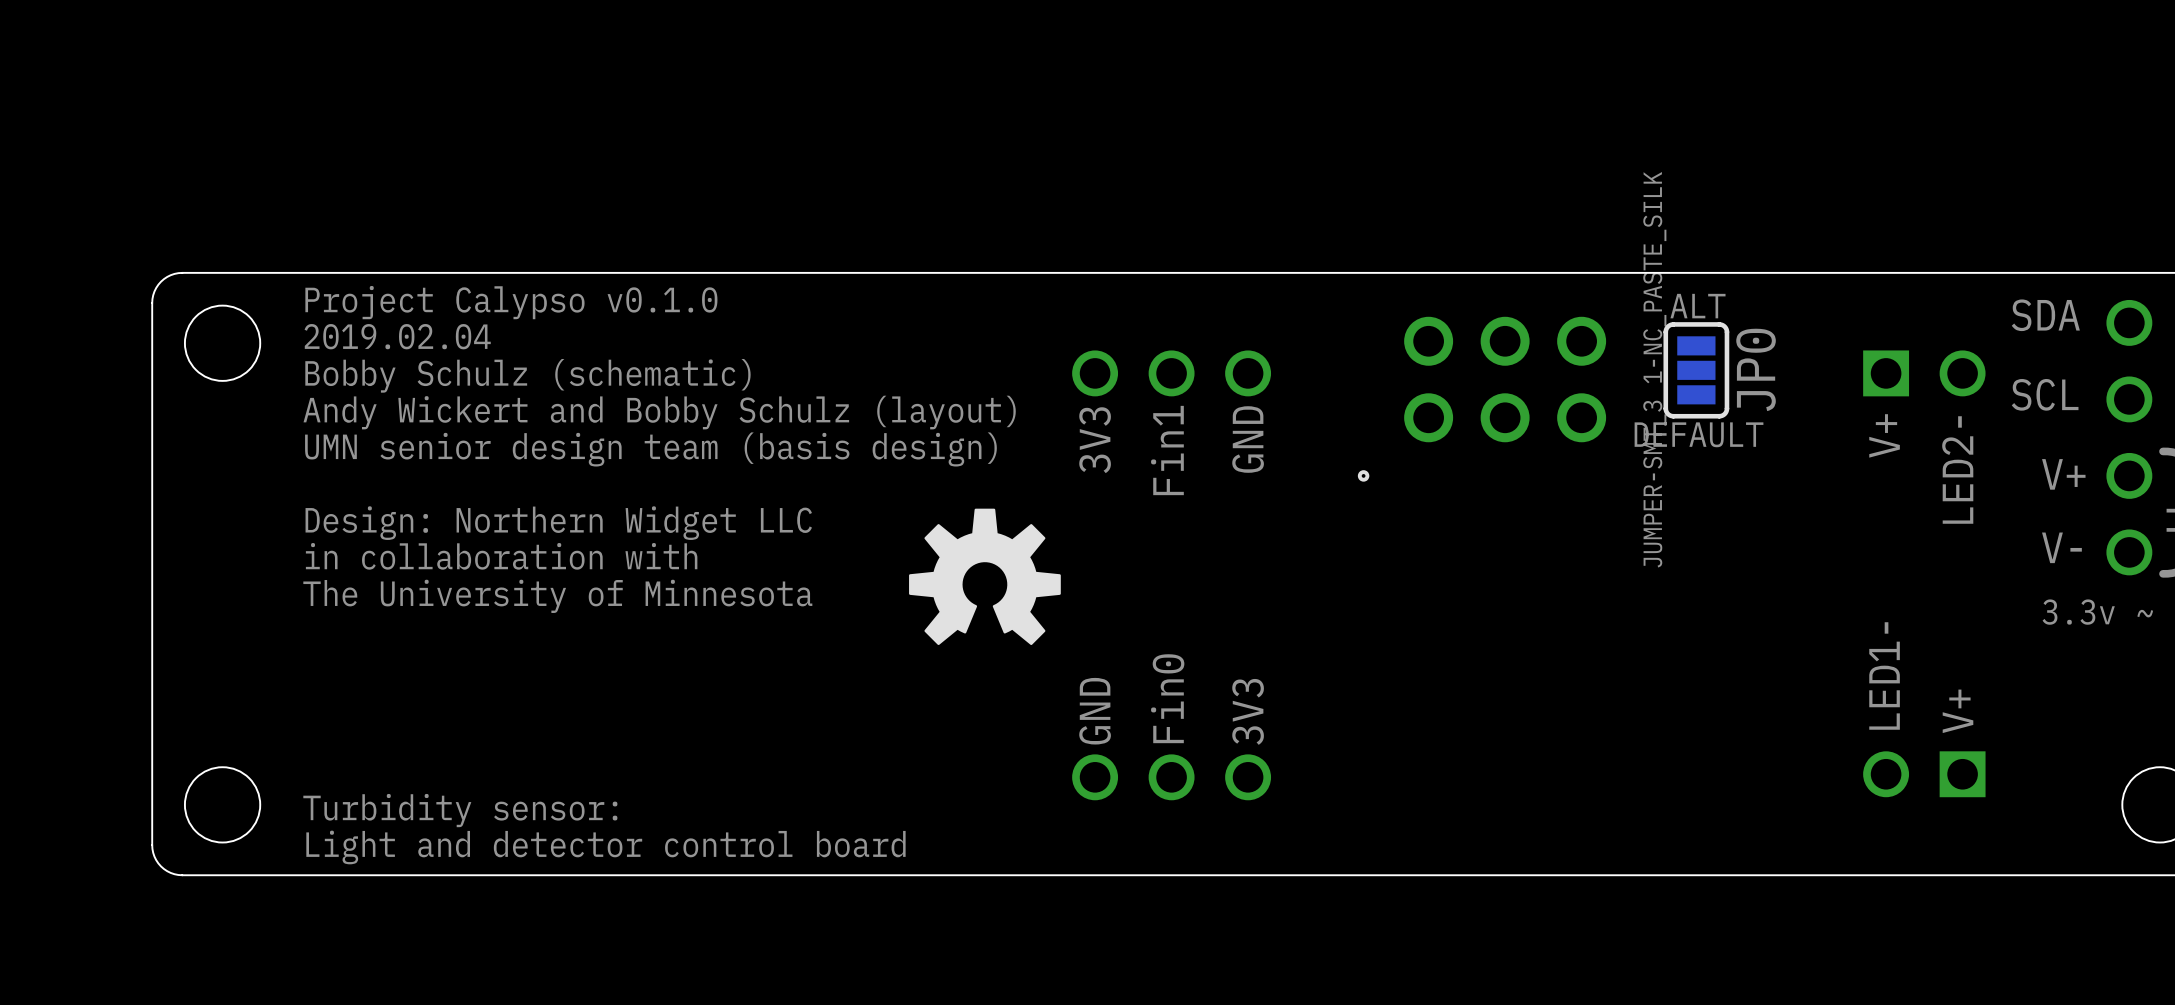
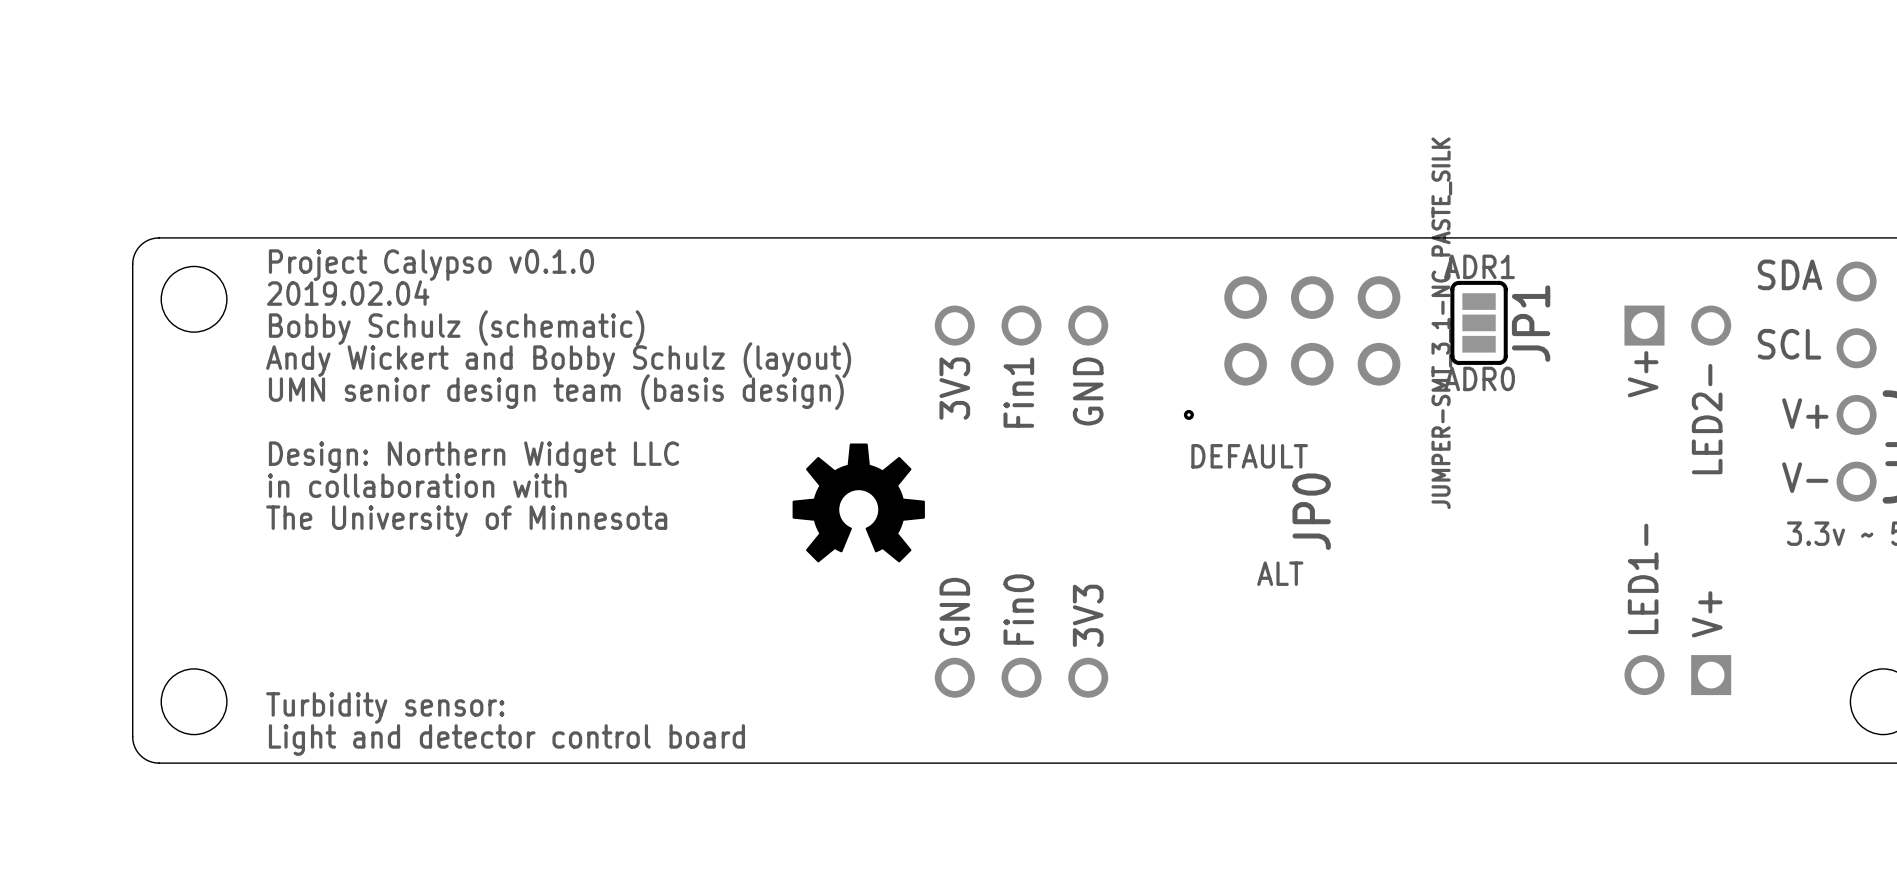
text: ALT (1697, 306) -> ADR1 (1479, 266)
text: JP0 (1756, 369) -> JP1 (1531, 323)
text: DEFAULT (1699, 434) -> ADR0 (1479, 378)
text: none -> DEFAULT (1249, 456)
text: none -> JP0 (1311, 511)
text: none -> ALT (1280, 573)

